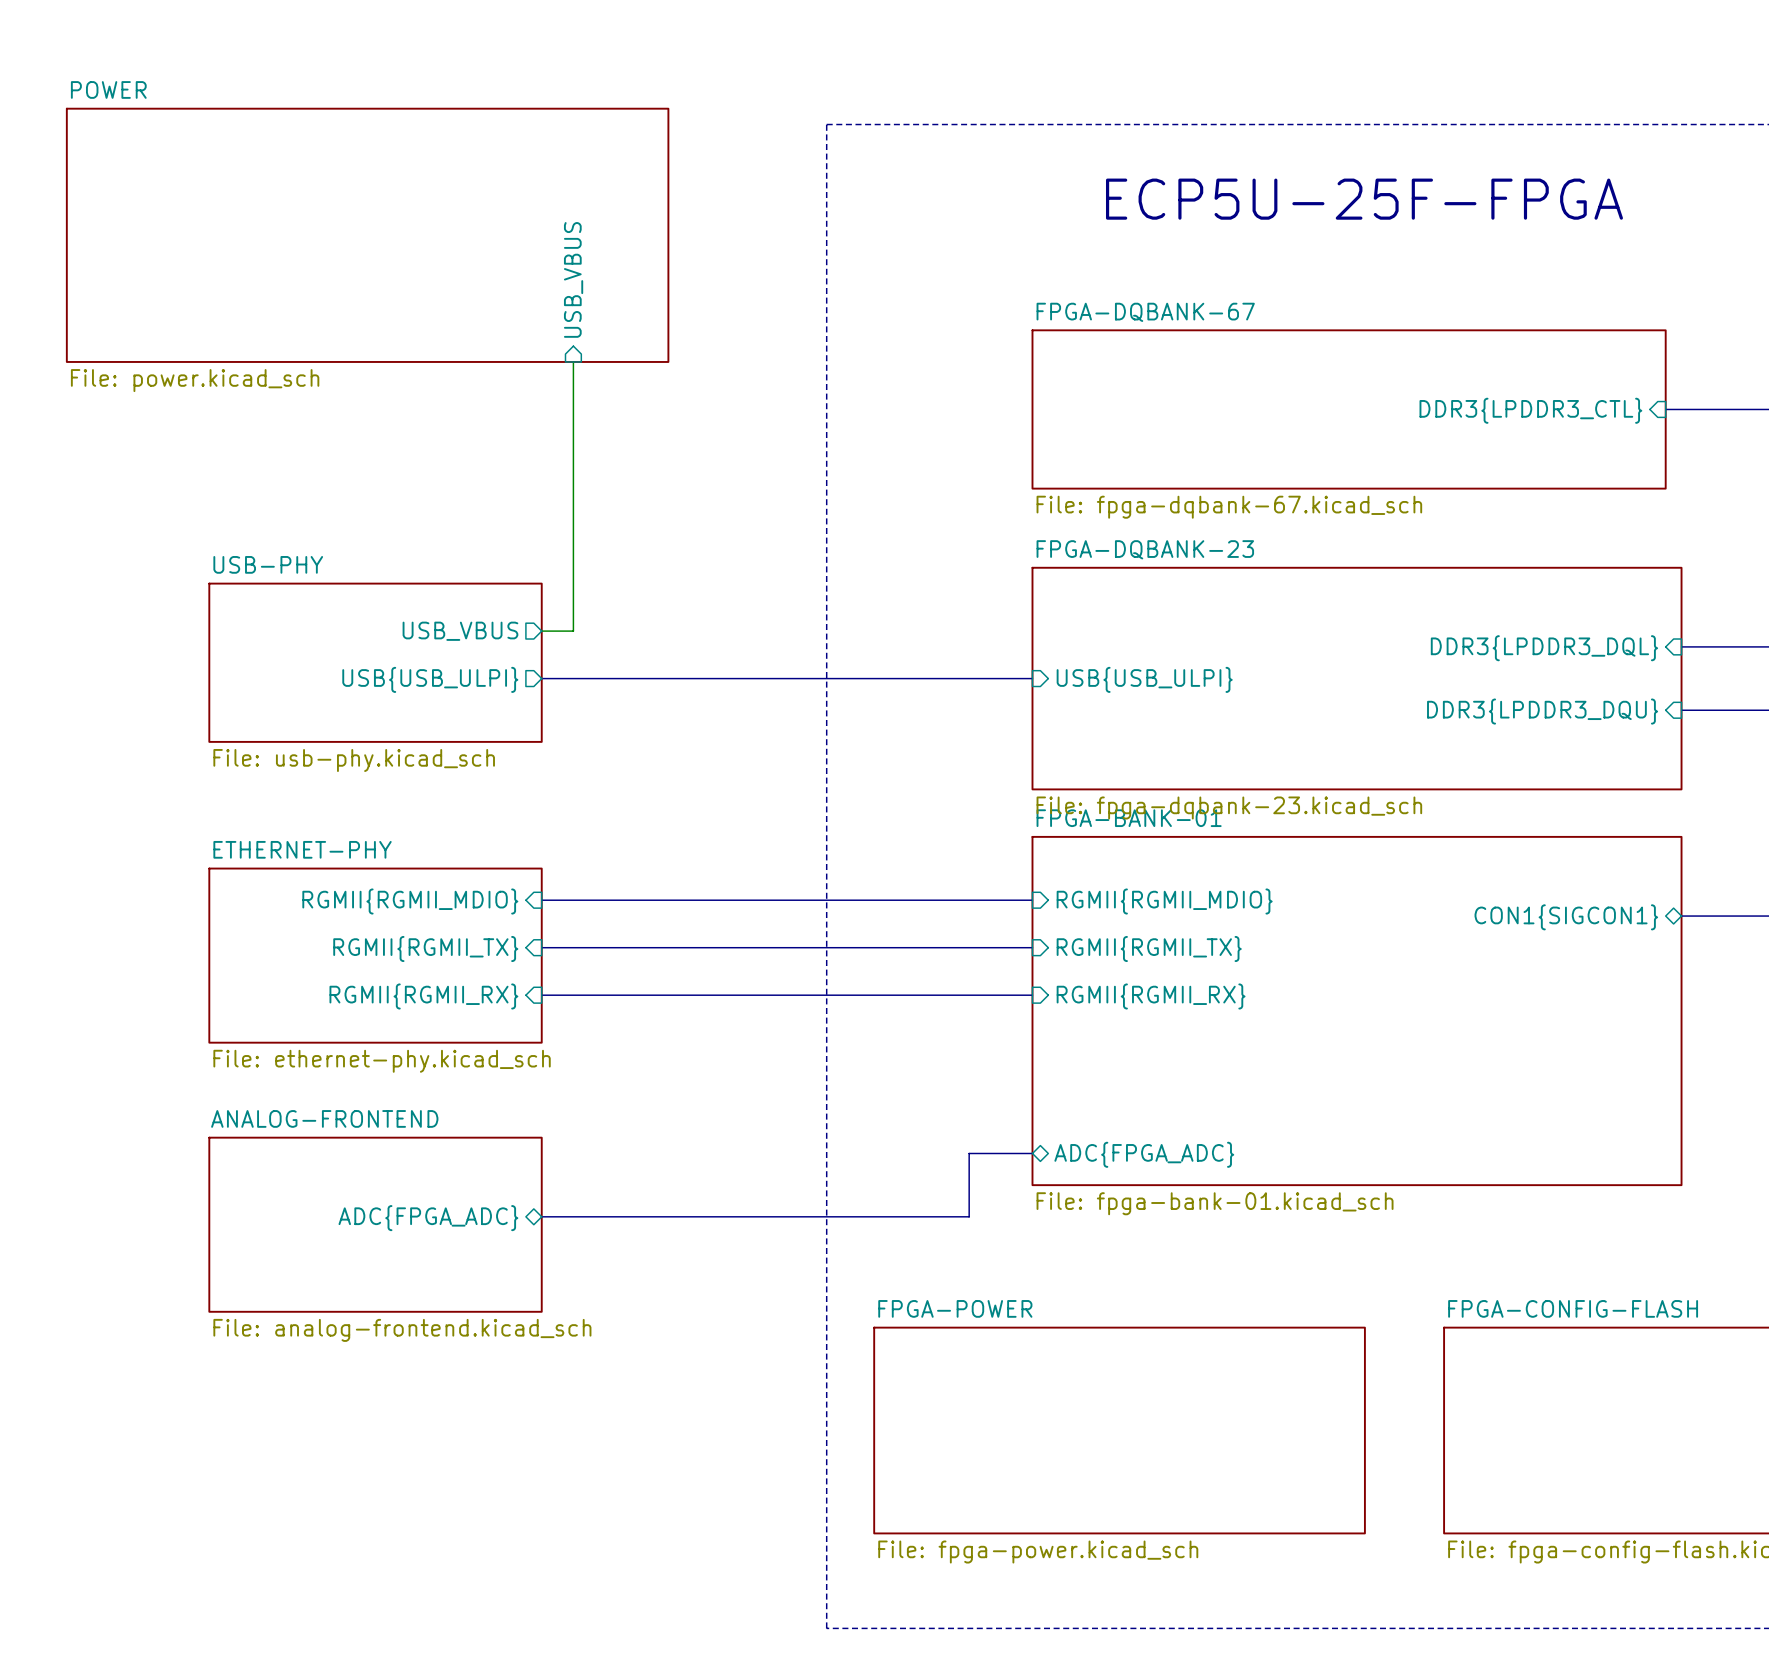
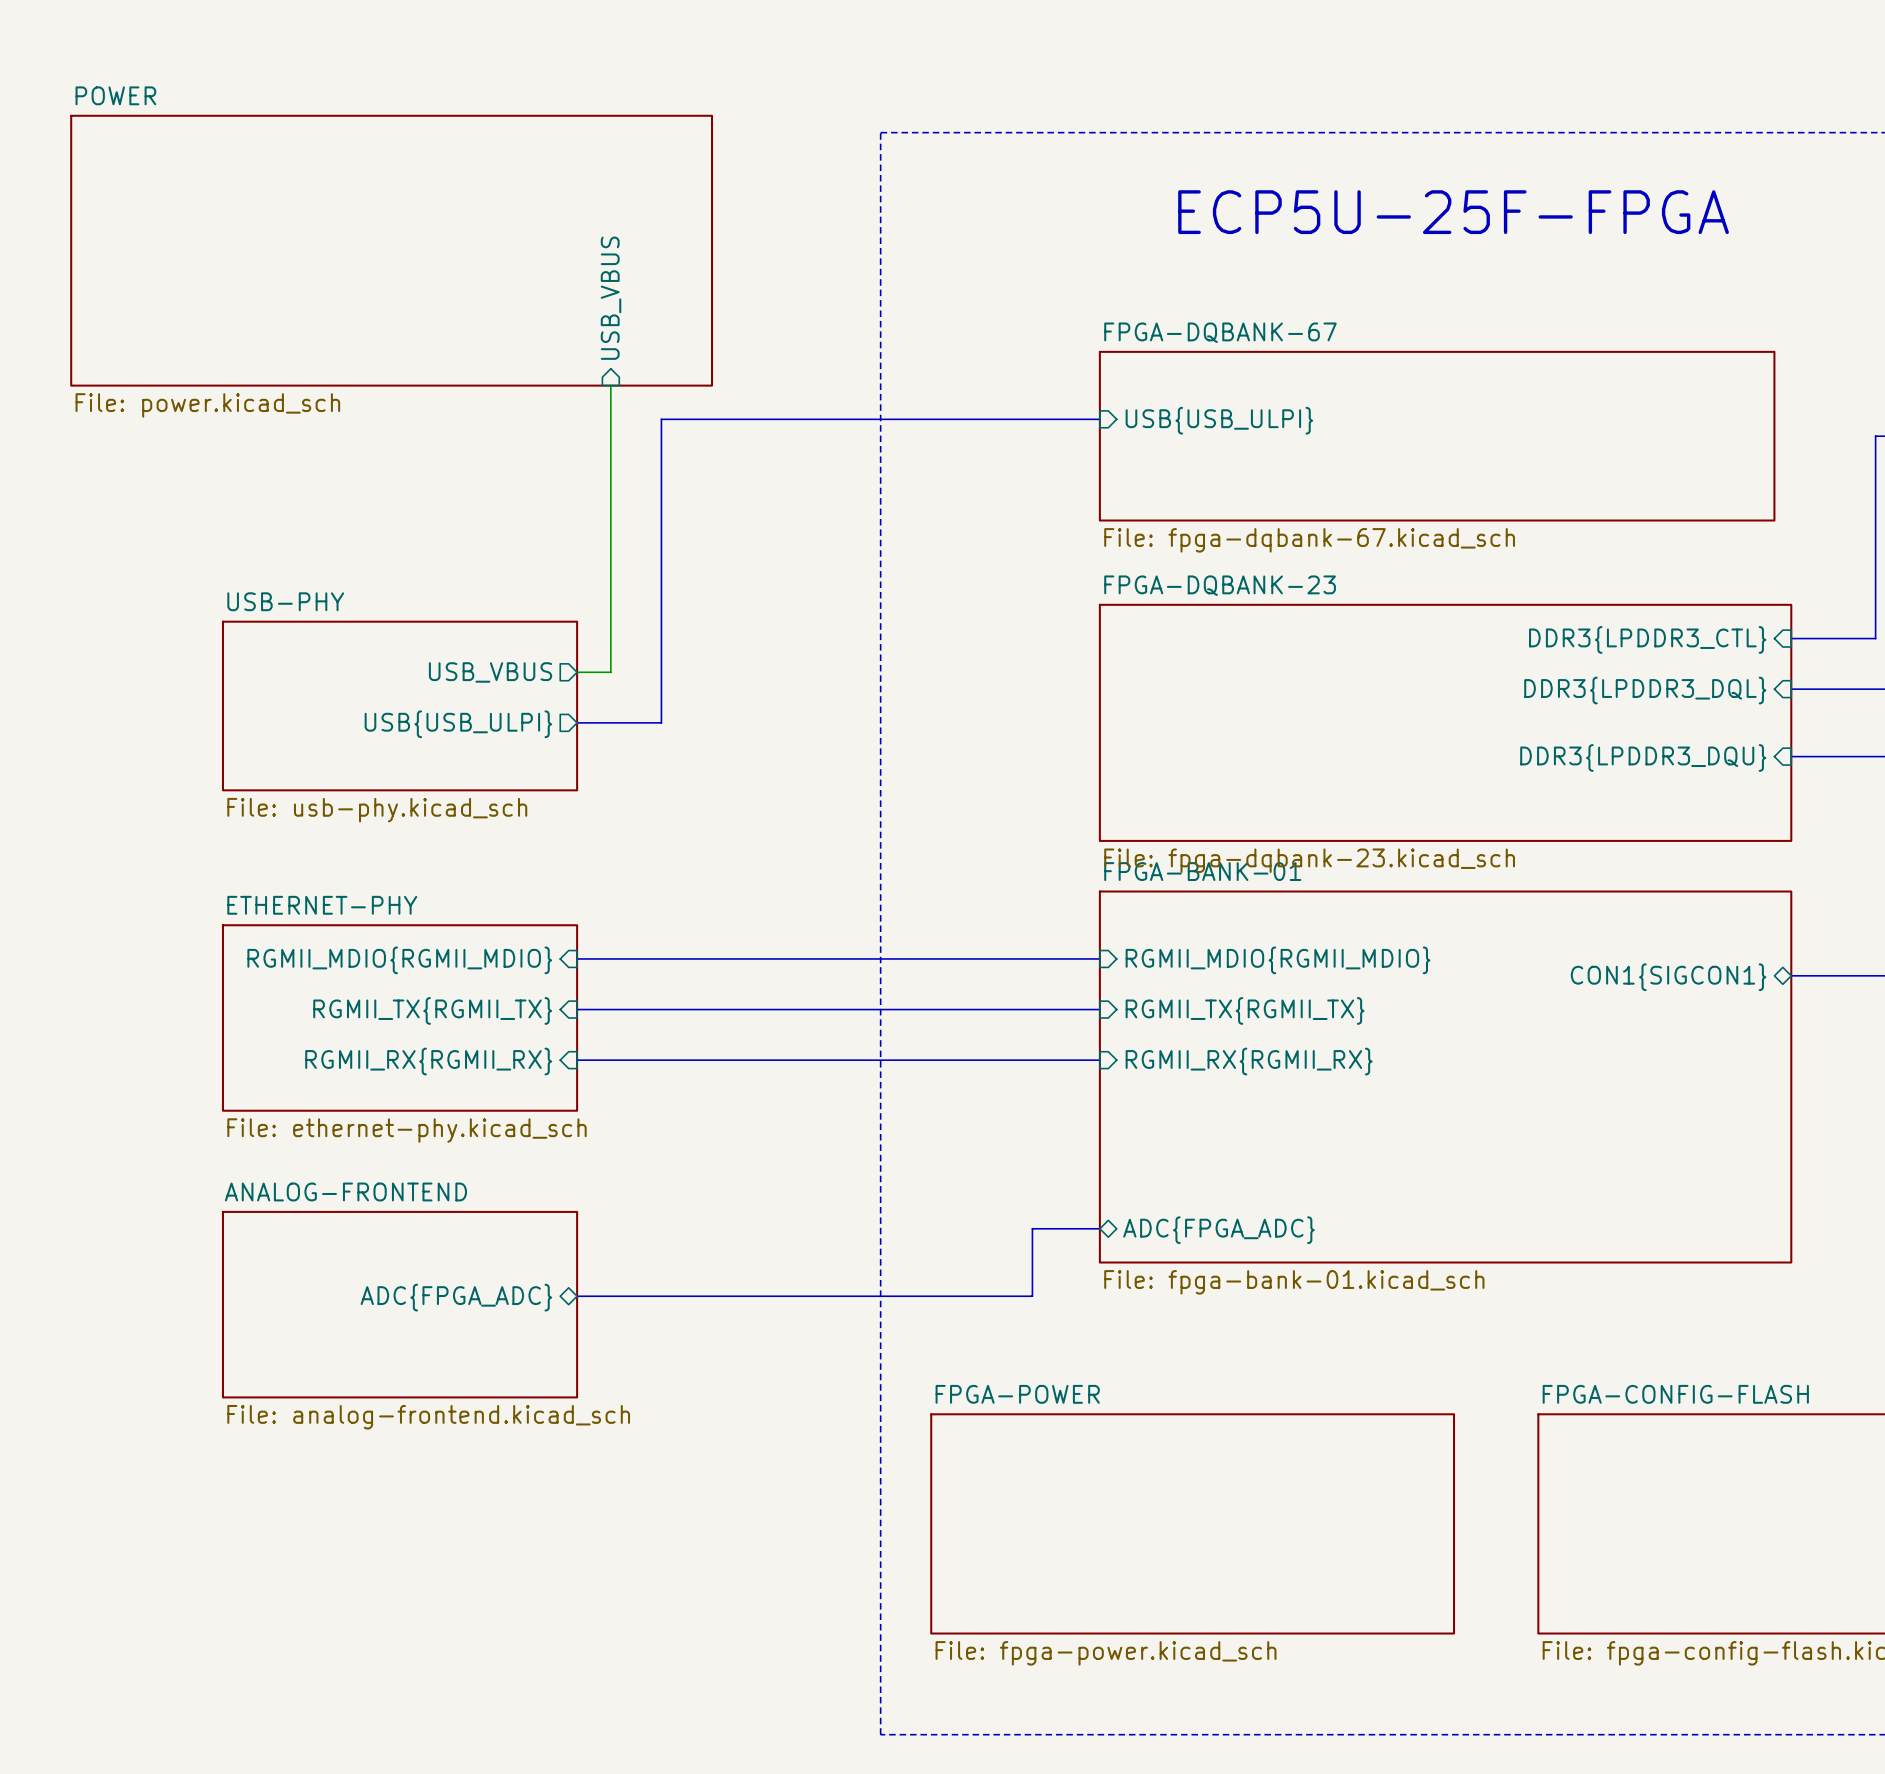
bus: (1665, 409) (1760, 409) -> (1791, 638) (1875, 638) (1875, 436)
sheet pin position: DDR3{LPDDR3_CTL} (1530, 410) -> DDR3{LPDDR3_CTL} (1647, 639)
bus: (620, 678) (1032, 678) -> (661, 722) (661, 419) (1099, 419)
sheet pin position: USB{USB_ULPI} (1144, 679) -> USB{USB_ULPI} (1219, 420)
sheet pin: RGMII{RGMII_MDIO} (410, 901) -> RGMII_MDIO{RGMII_MDIO} (399, 960)
sheet pin: RGMII{RGMII_MDIO} (1164, 901) -> RGMII_MDIO{RGMII_MDIO} (1278, 960)
sheet pin: RGMII{RGMII_TX} (425, 948) -> RGMII_TX{RGMII_TX} (432, 1010)
sheet pin: RGMII{RGMII_TX} (1149, 948) -> RGMII_TX{RGMII_TX} (1245, 1010)
sheet pin: RGMII{RGMII_RX} (423, 996) -> RGMII_RX{RGMII_RX} (428, 1061)
sheet pin: RGMII{RGMII_RX} (1151, 996) -> RGMII_RX{RGMII_RX} (1249, 1061)

